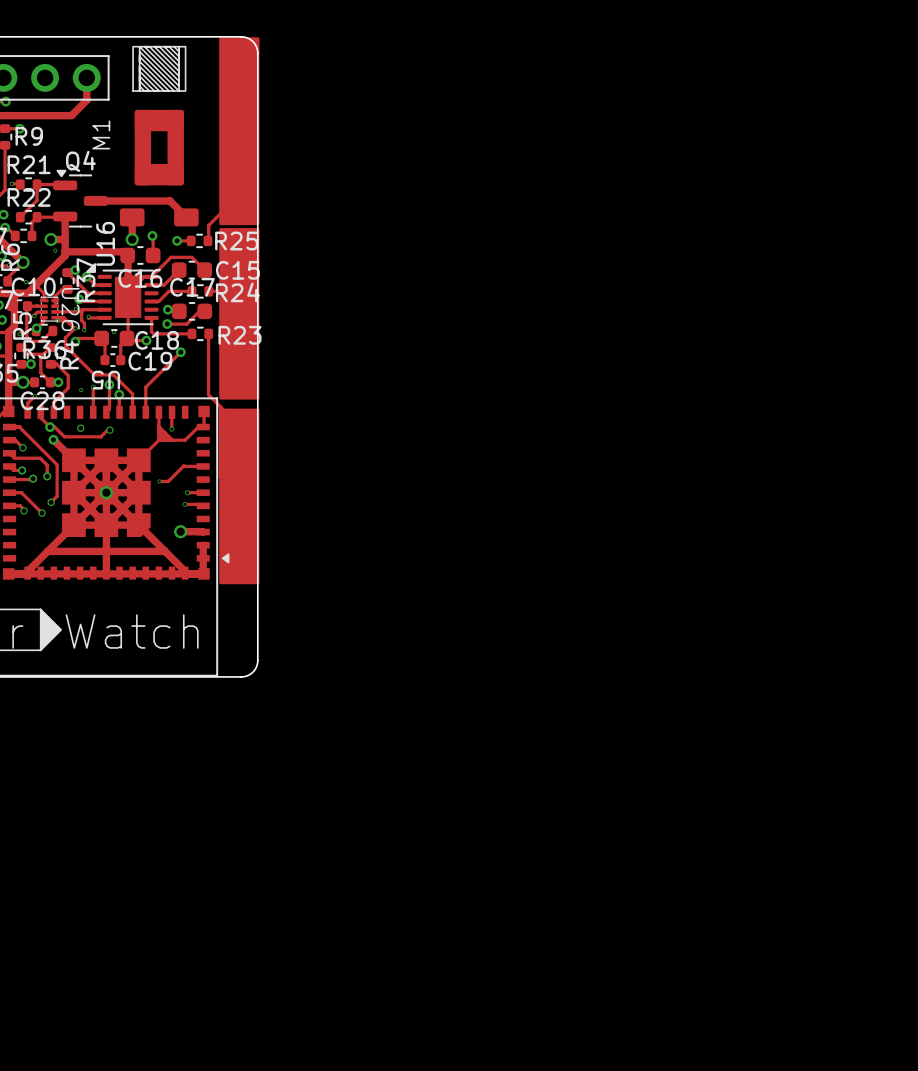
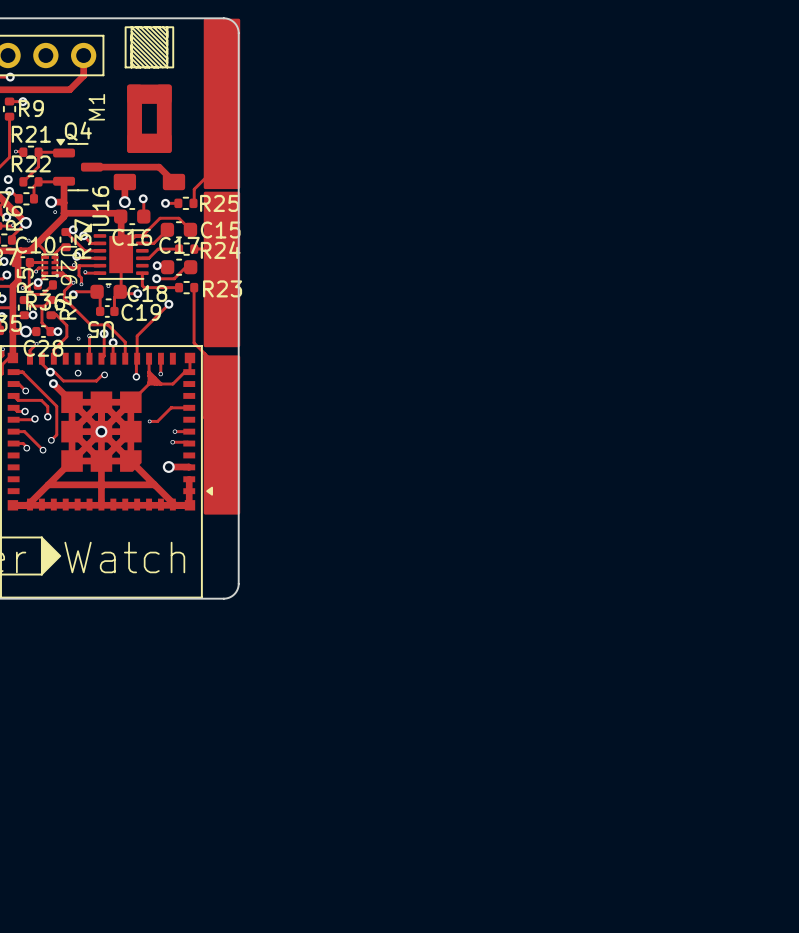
track: none -> (137, 358) (136, 376)
via: none -> (136, 376)

